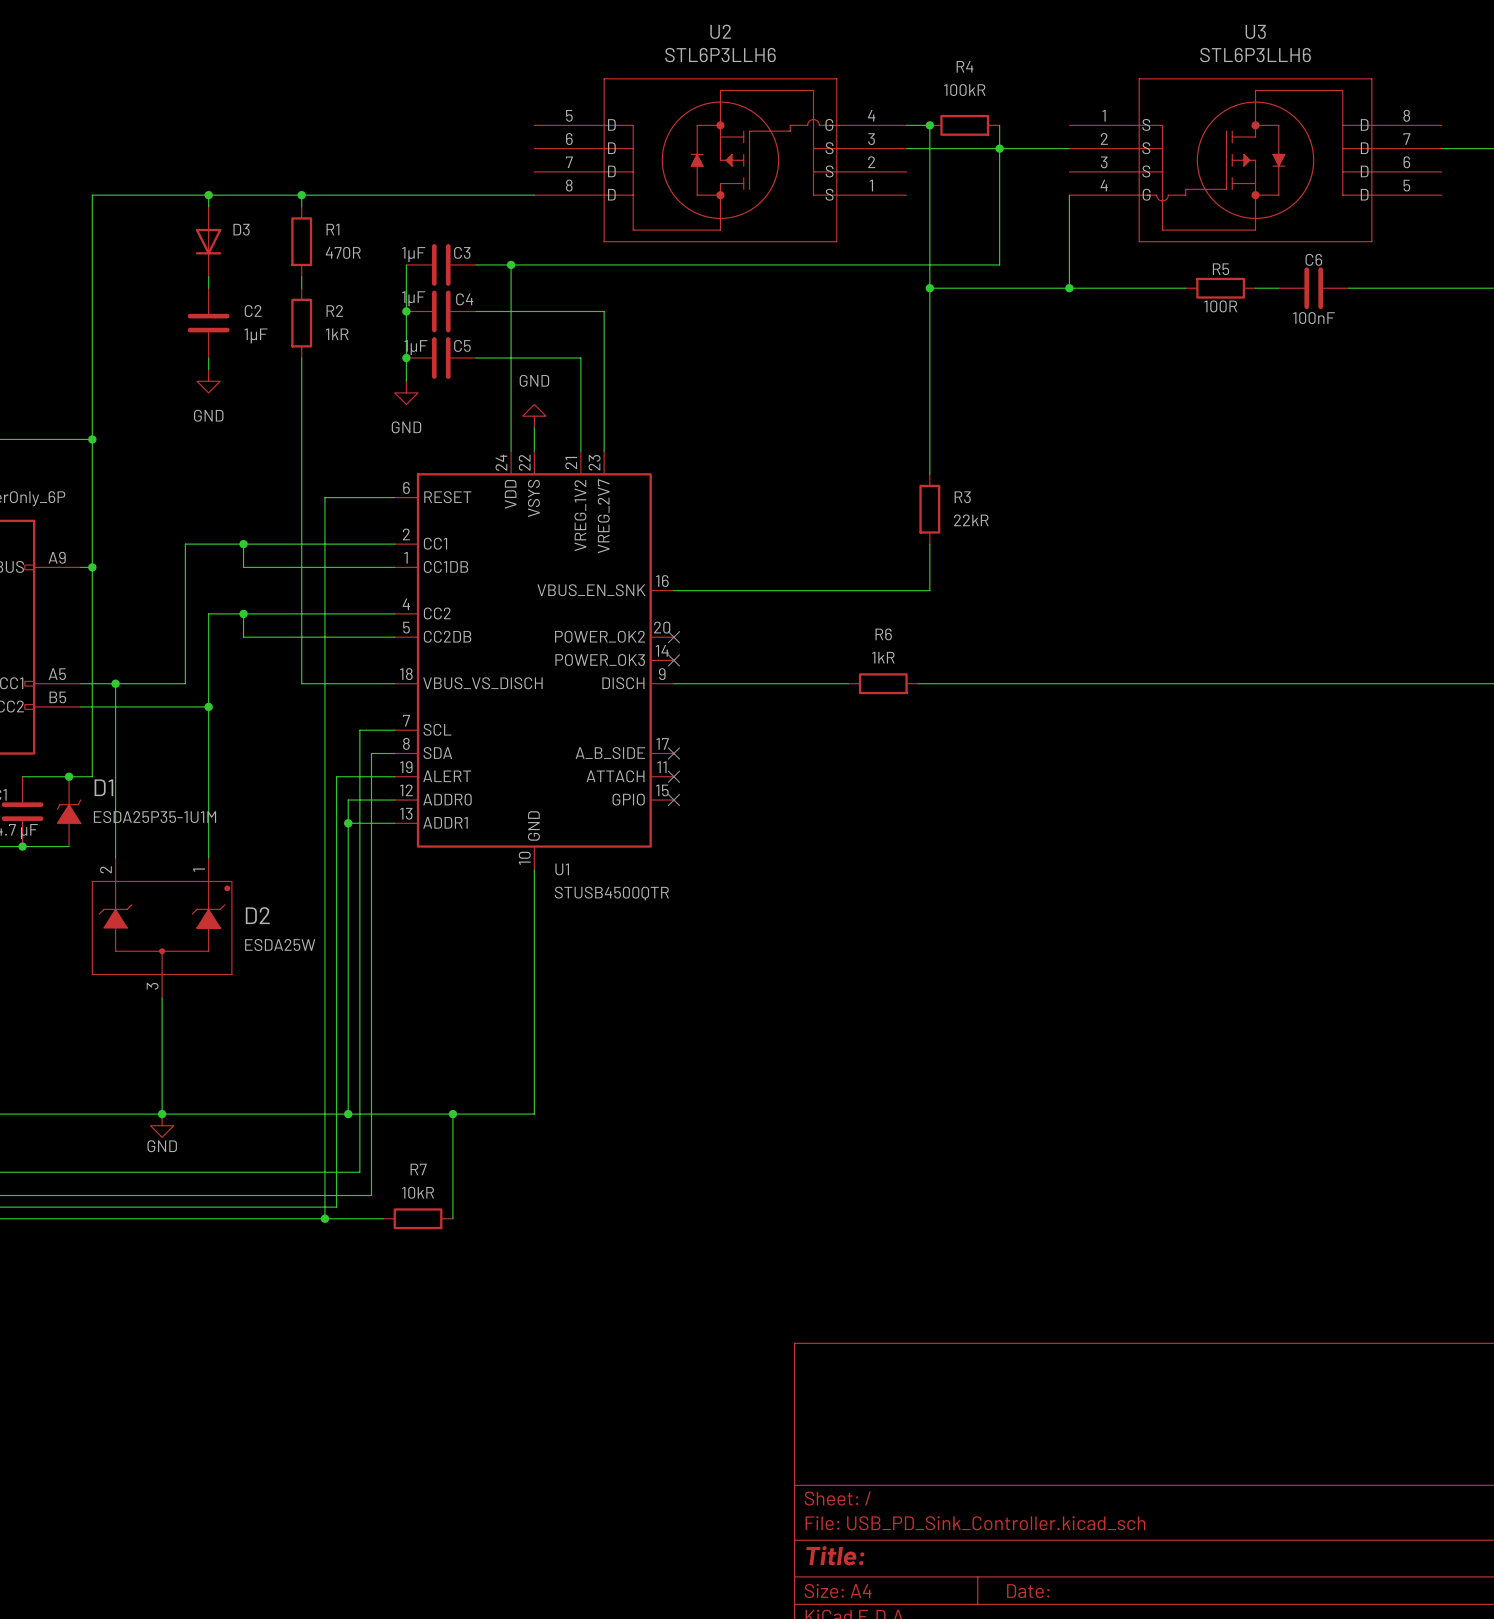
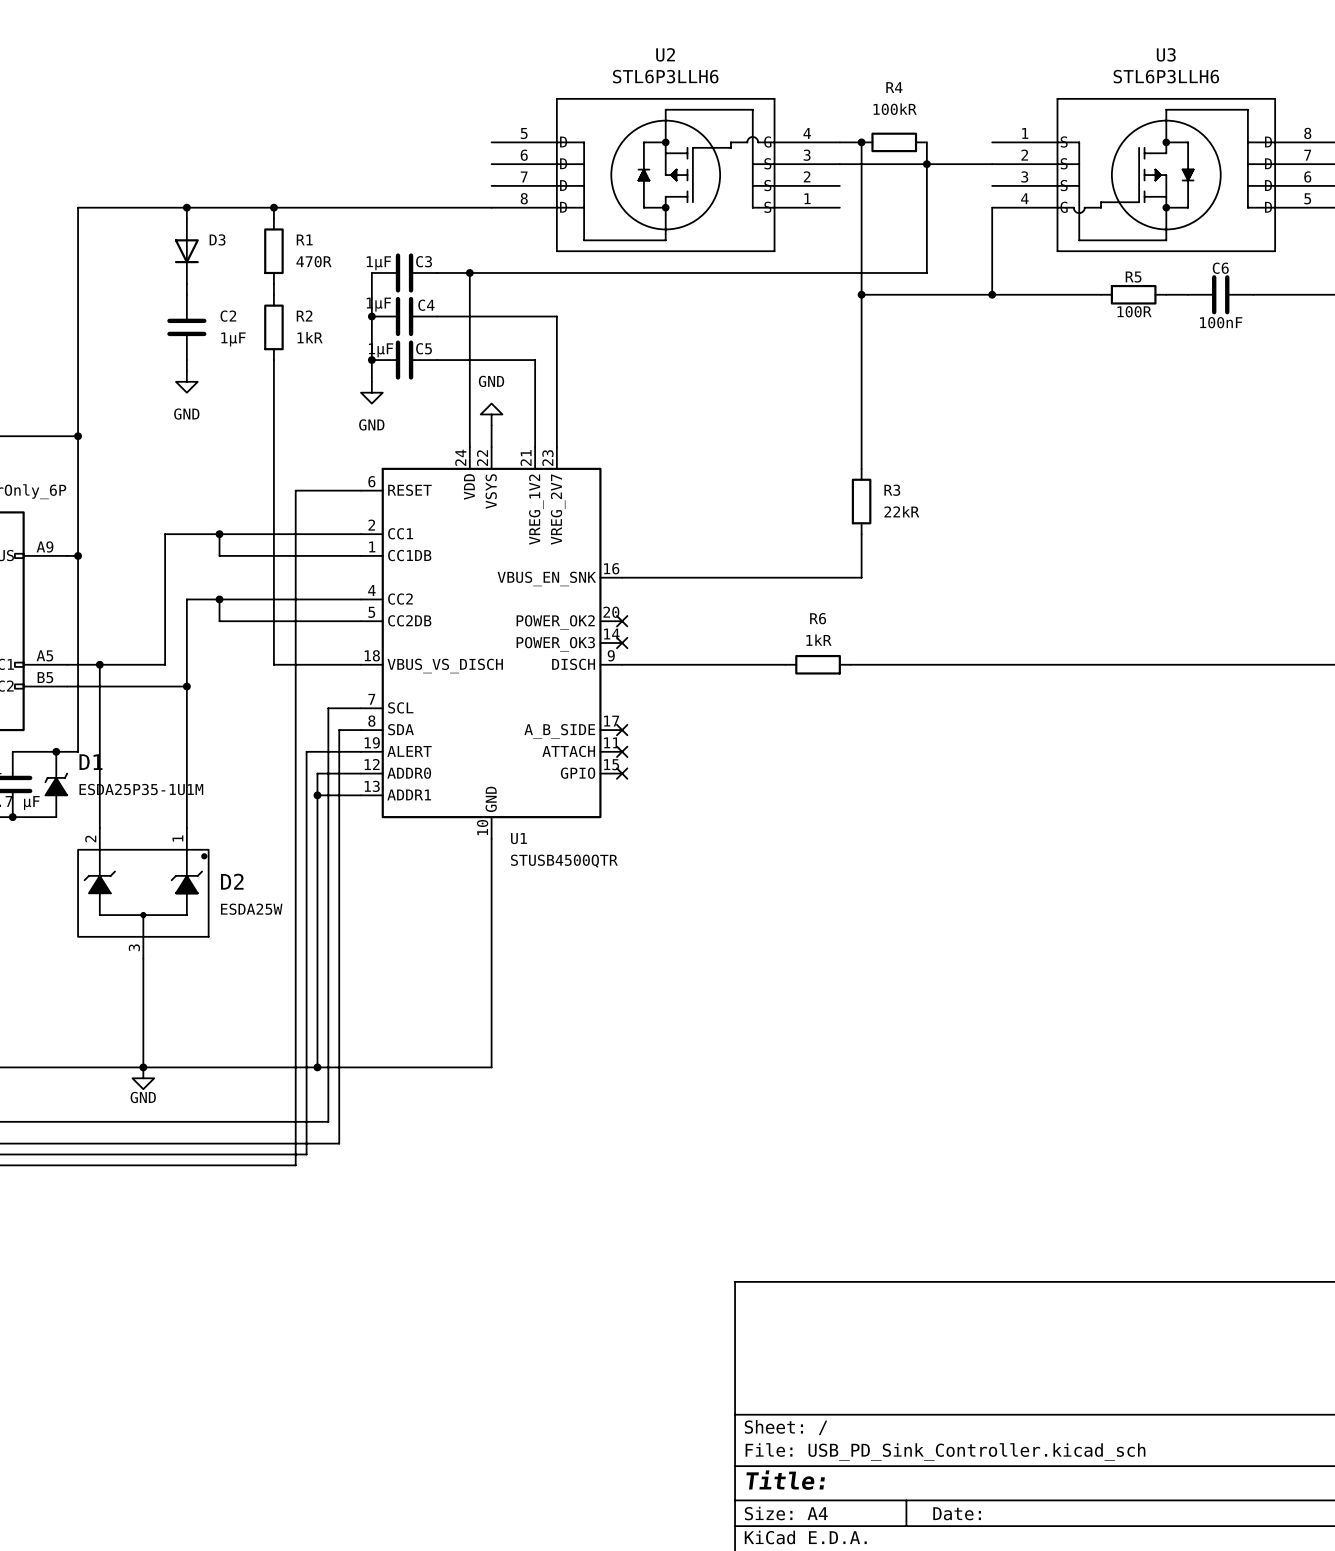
wire: (452, 1114) (452, 1218) -> none
junction: (452, 1114) -> none
wire: (324, 1218) (383, 1218) -> none
junction: (324, 1218) -> none
R7: 10kR (418, 1218) -> none

